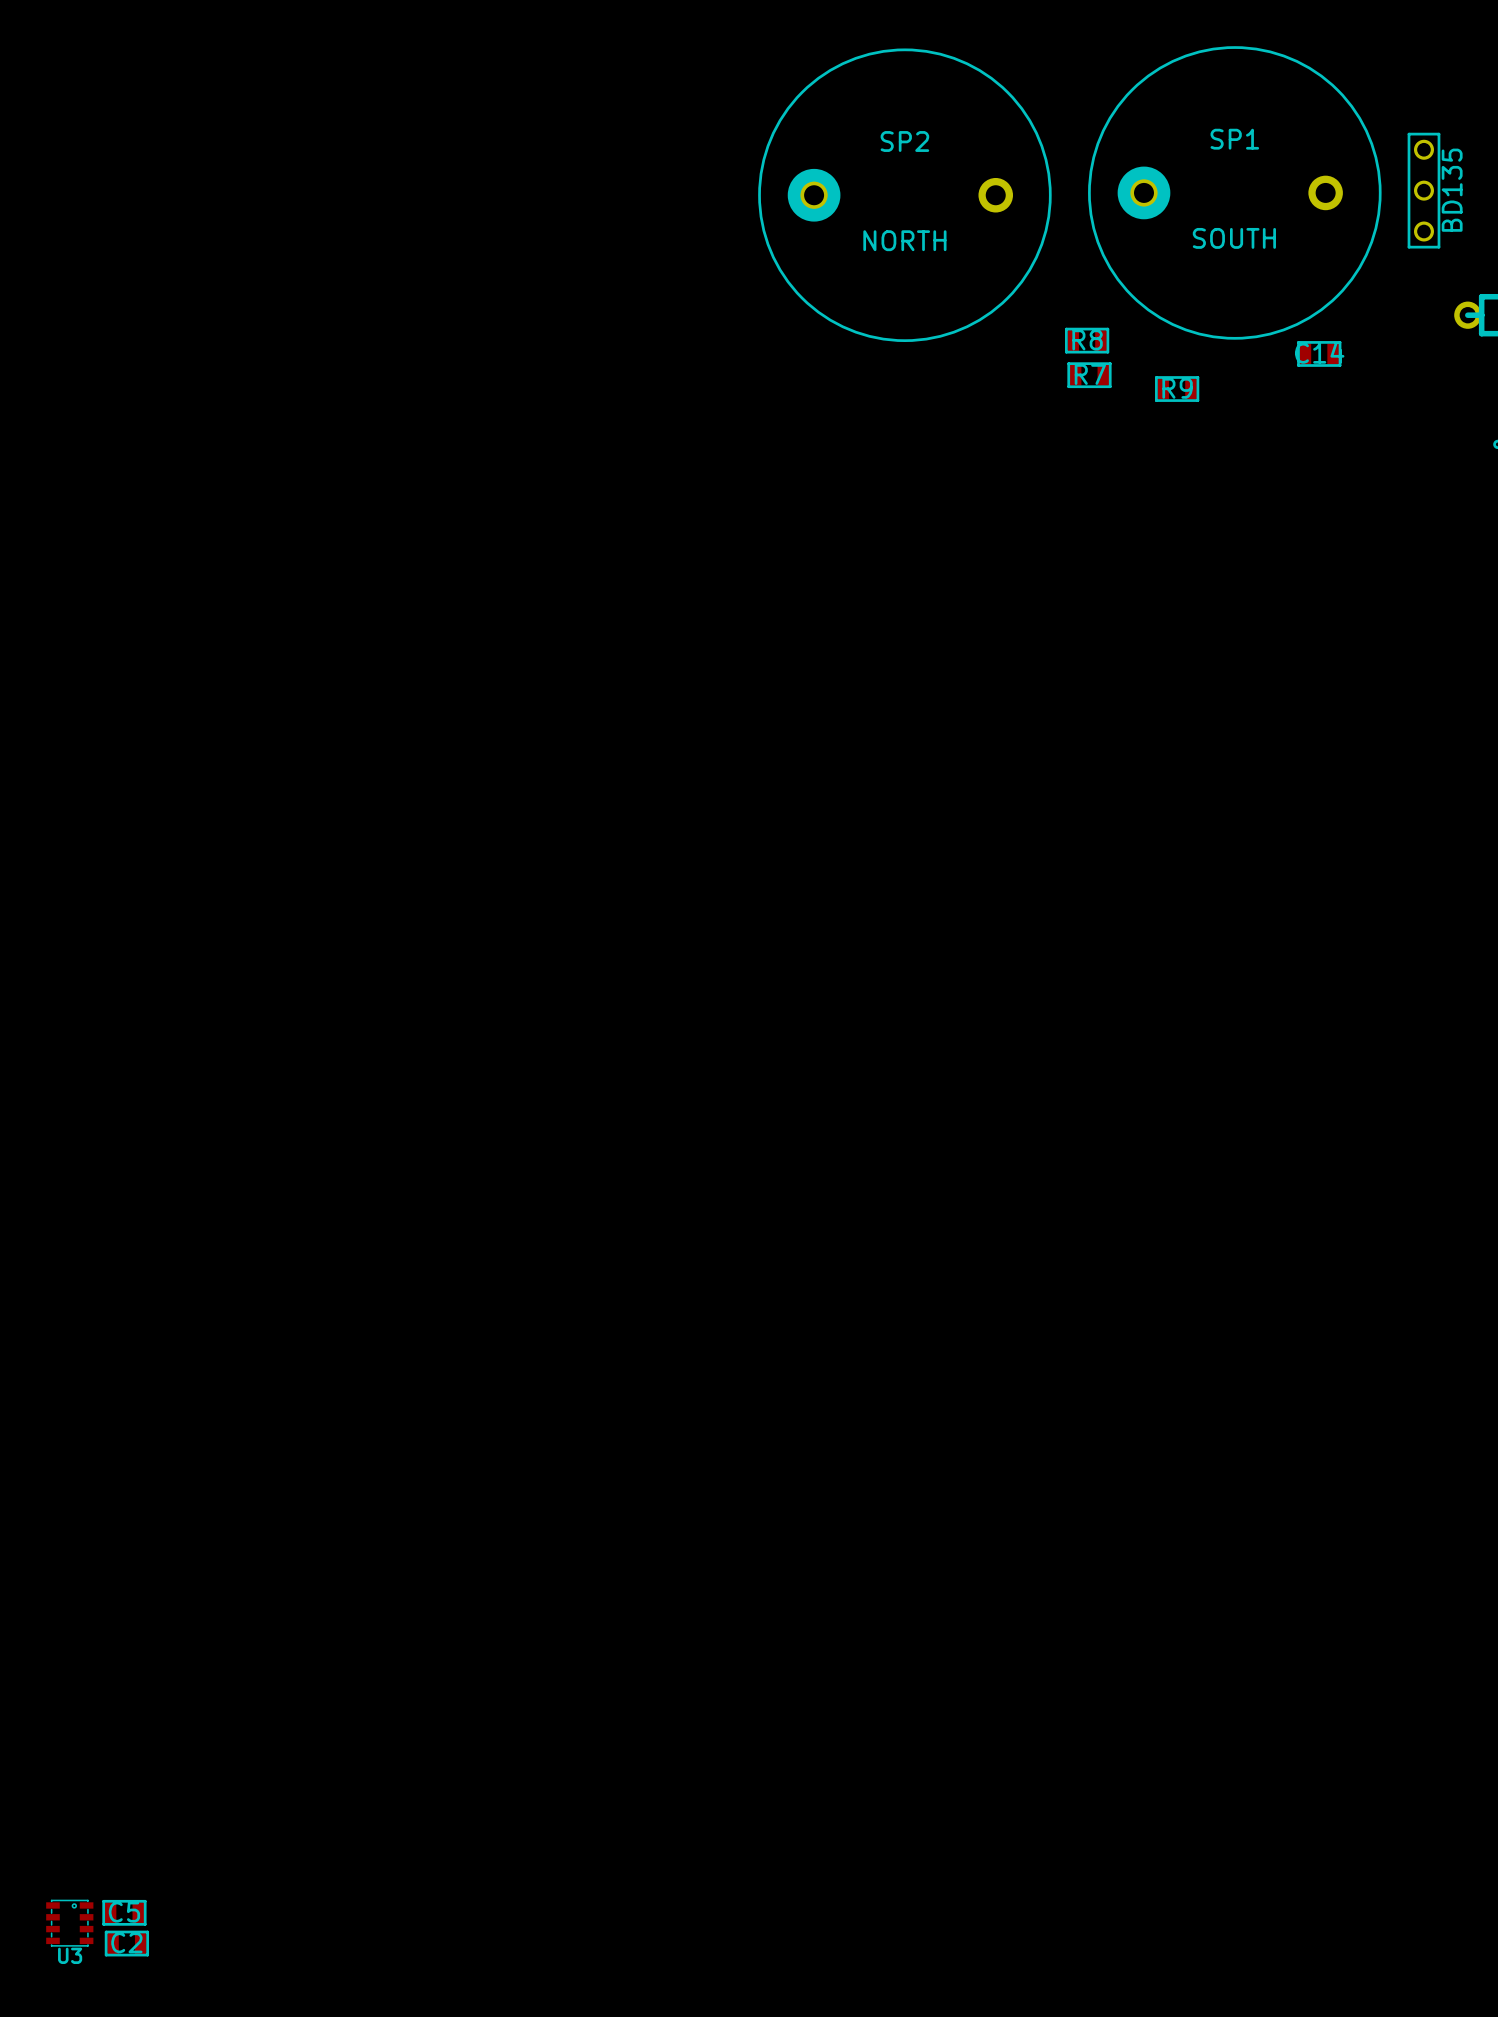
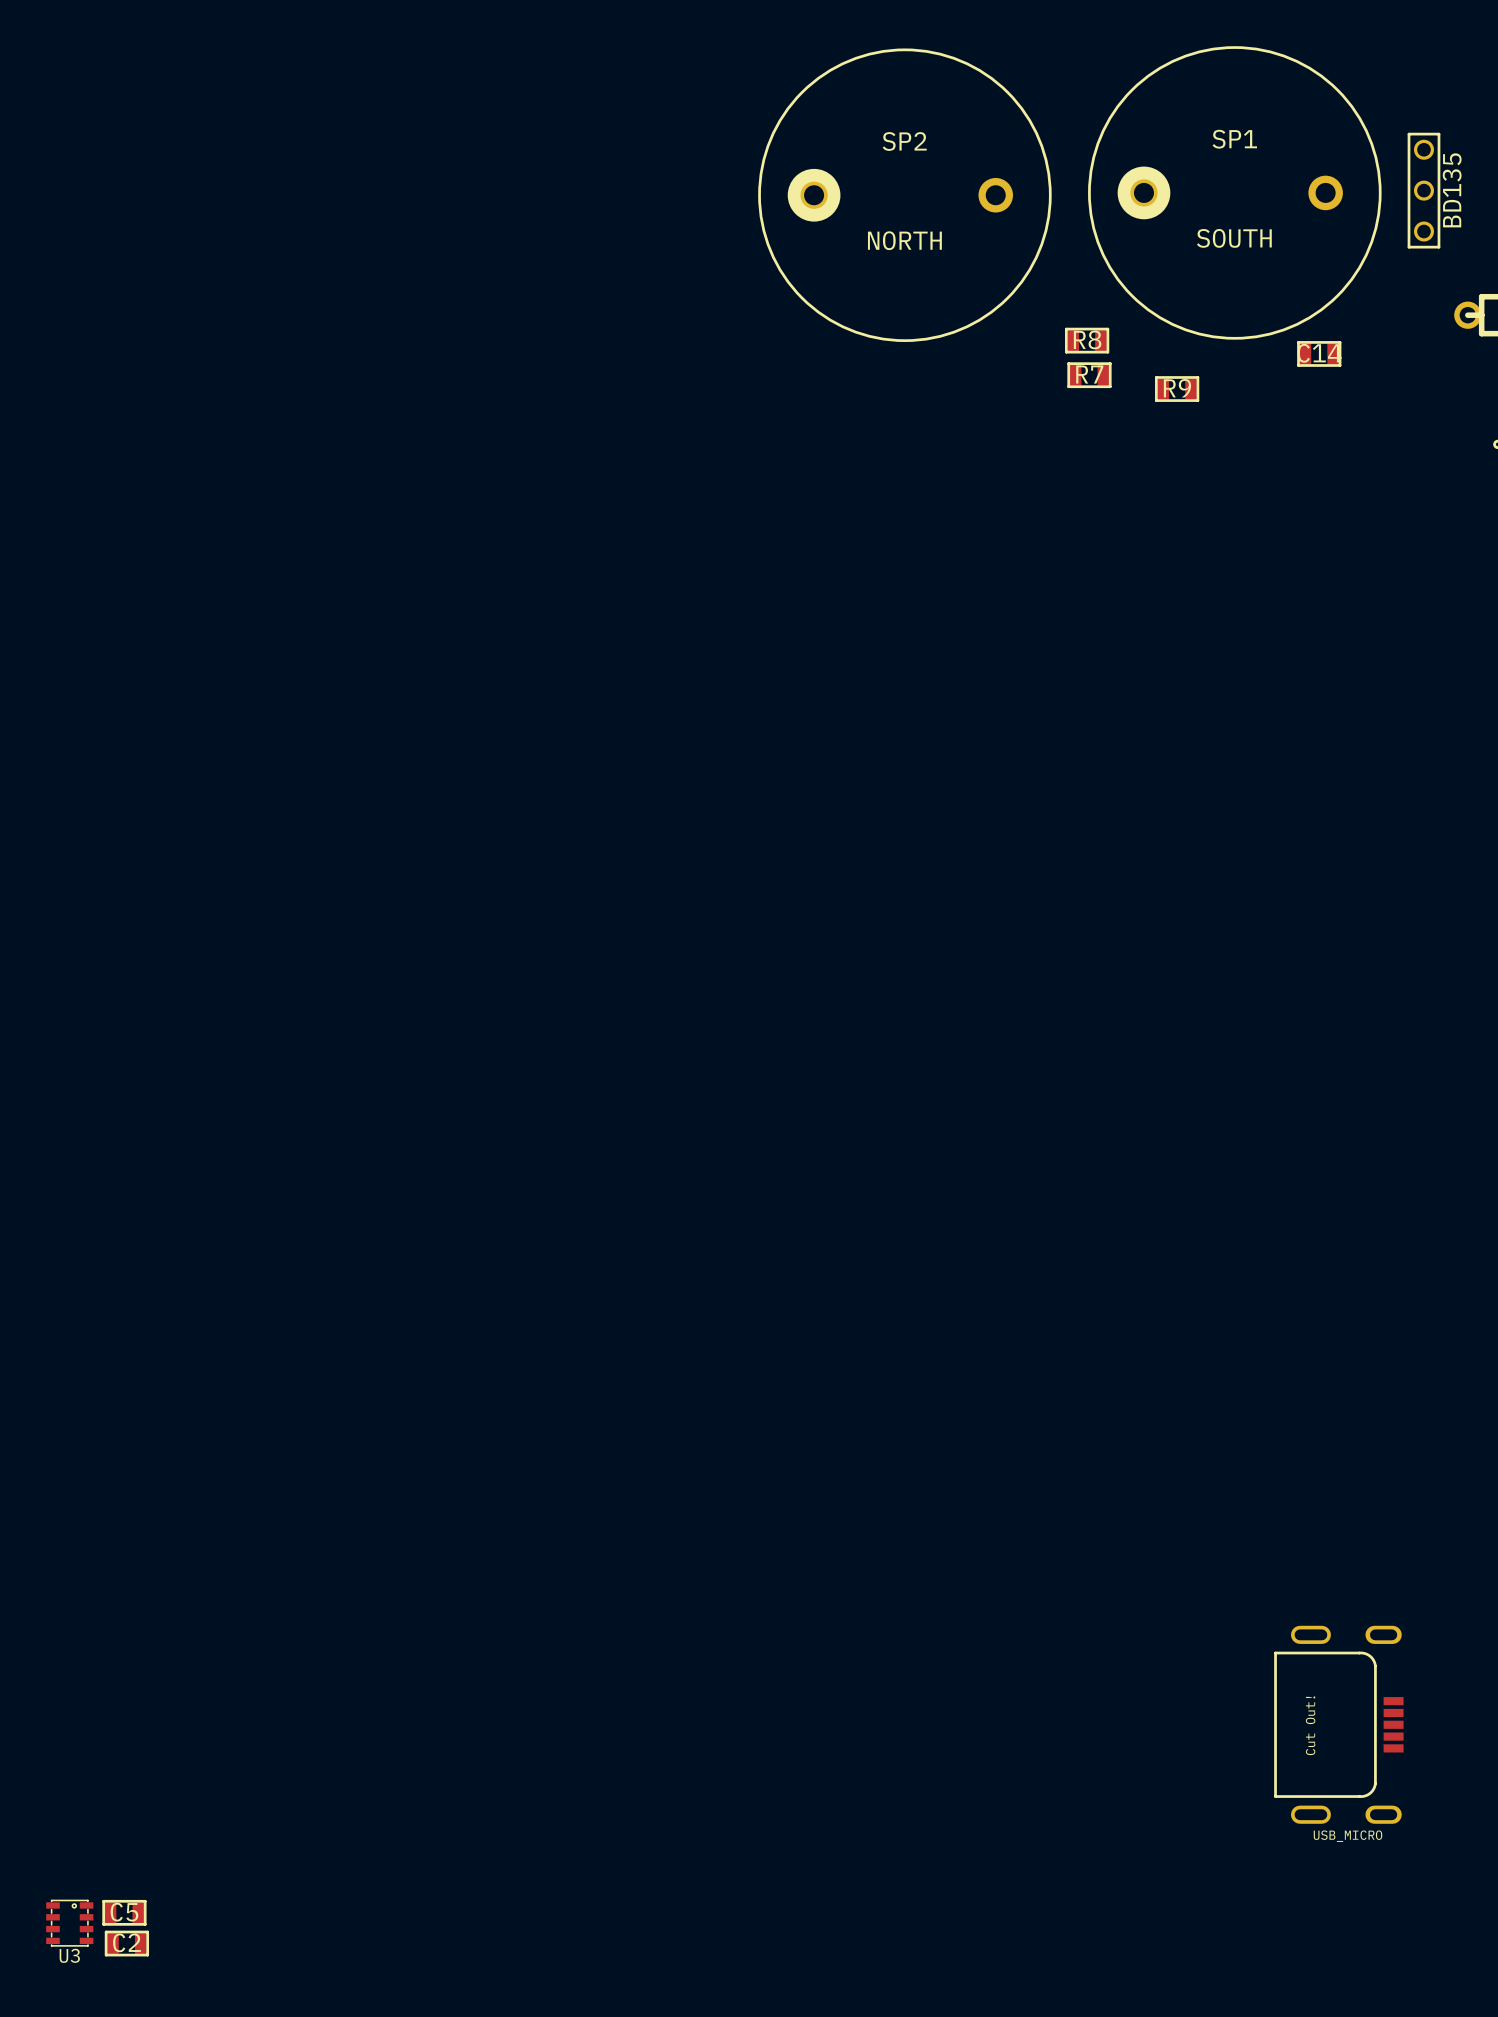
part: none -> USB_MICRO (1338, 1724)

